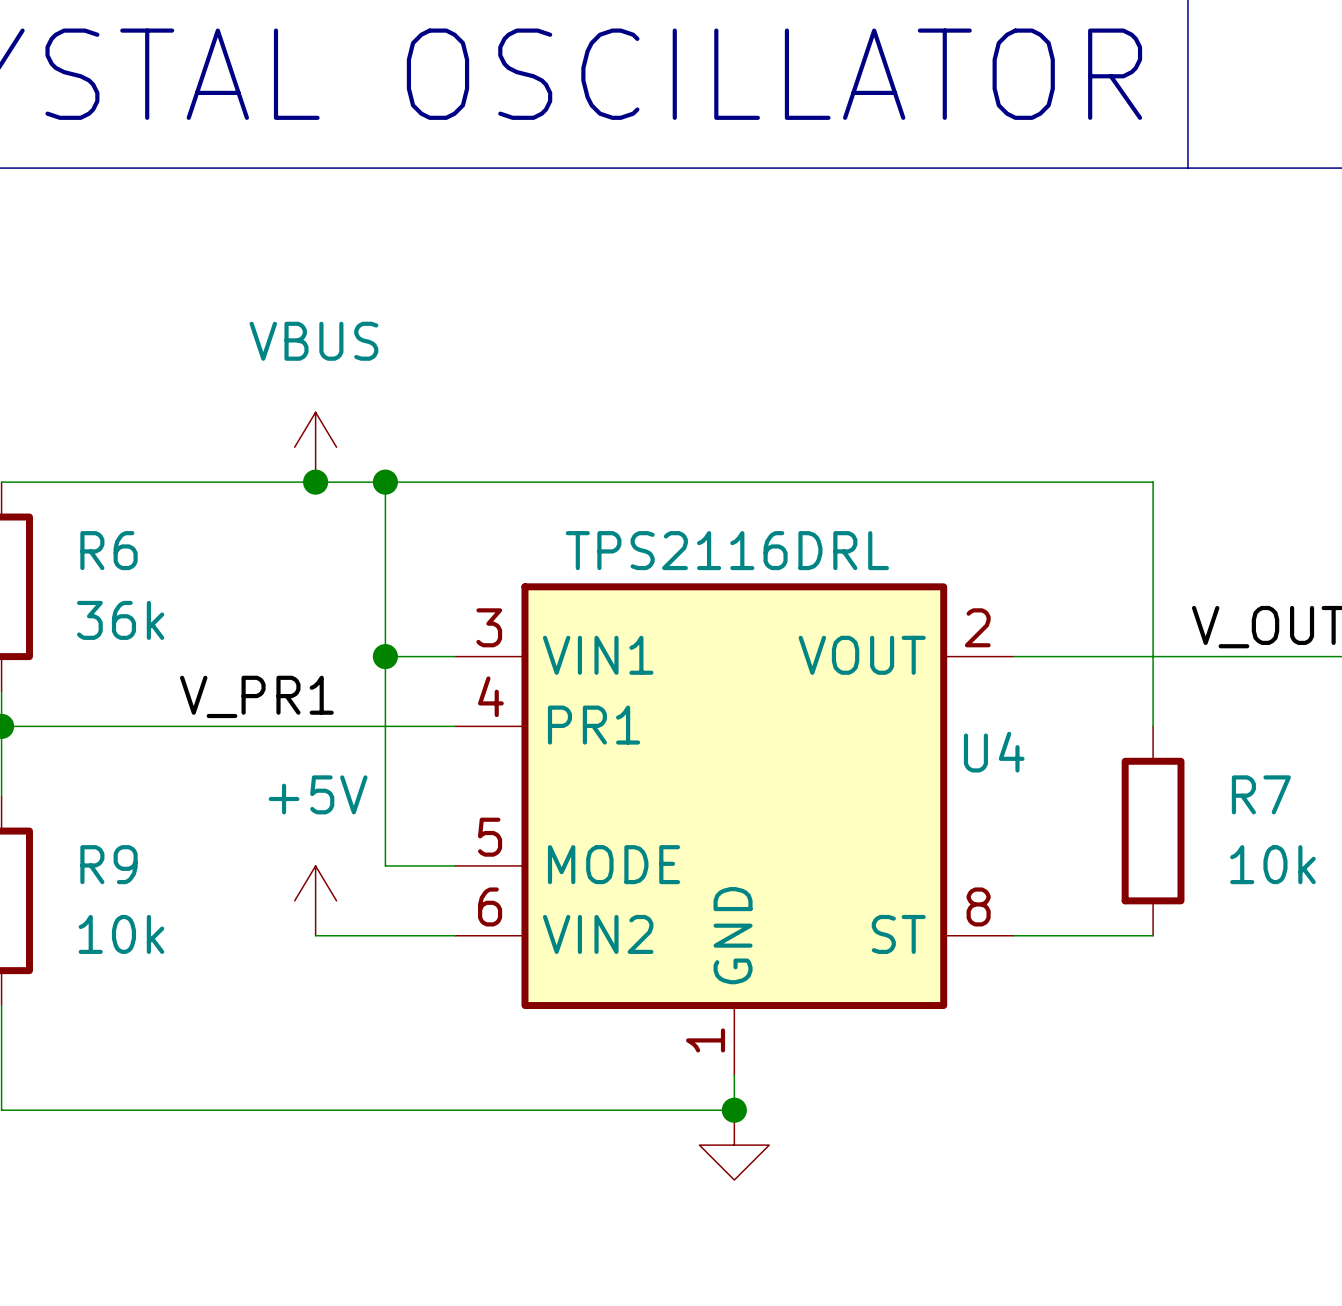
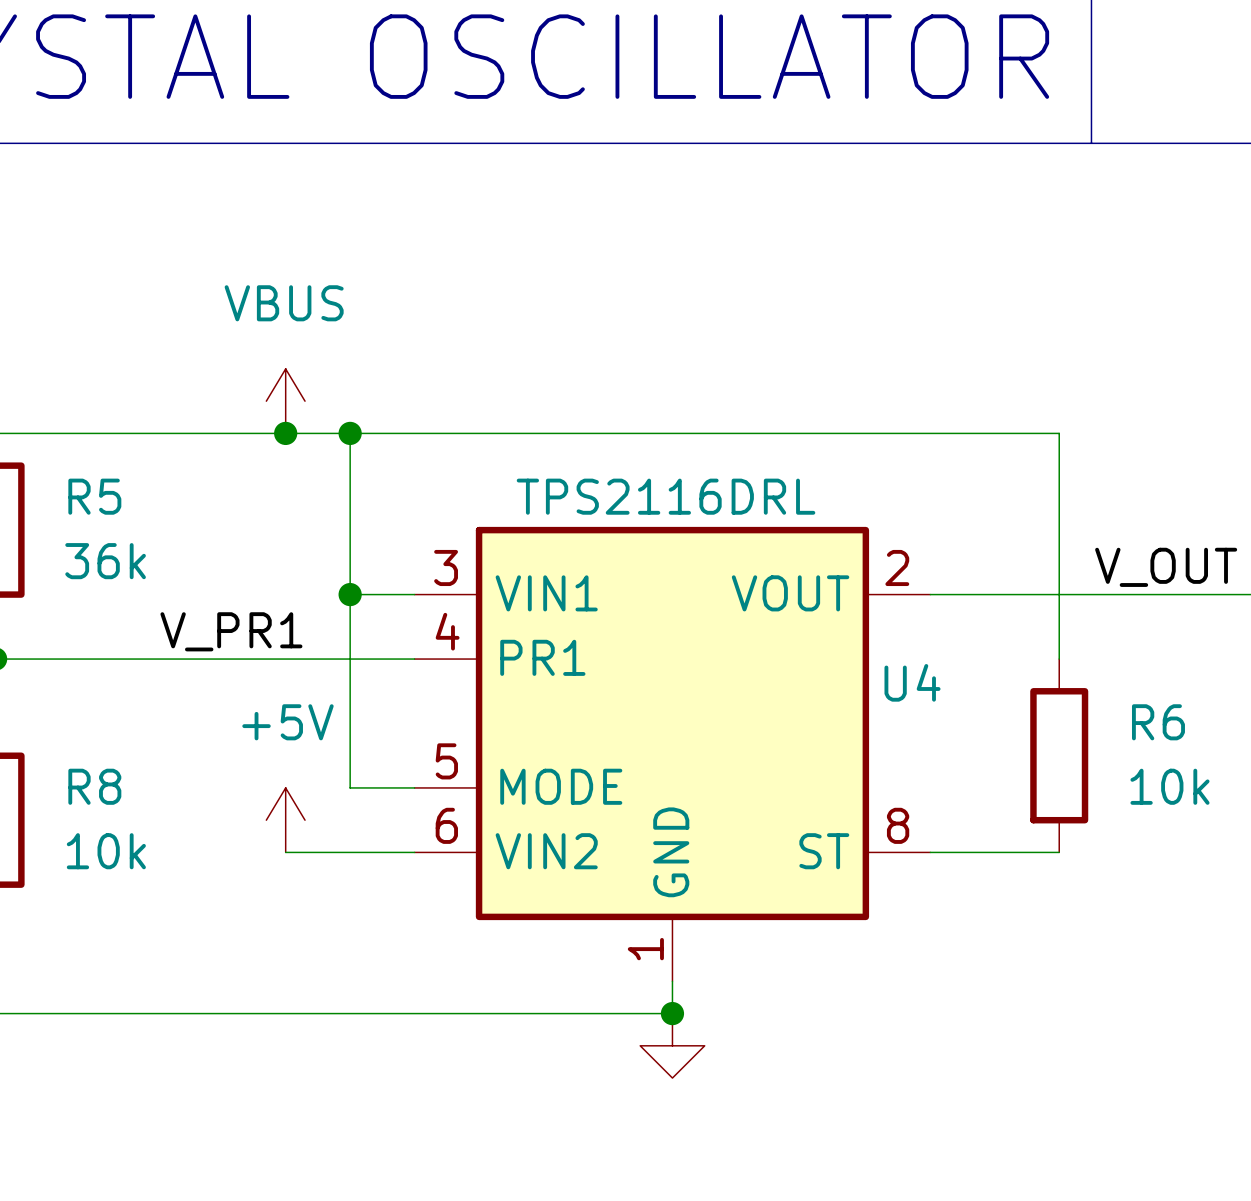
R6 name: R6 (109, 550) -> R5 (94, 496)
R7 name: R7 (1261, 794) -> R6 (1158, 722)
R9 name: R9 (109, 864) -> R8 (94, 786)

